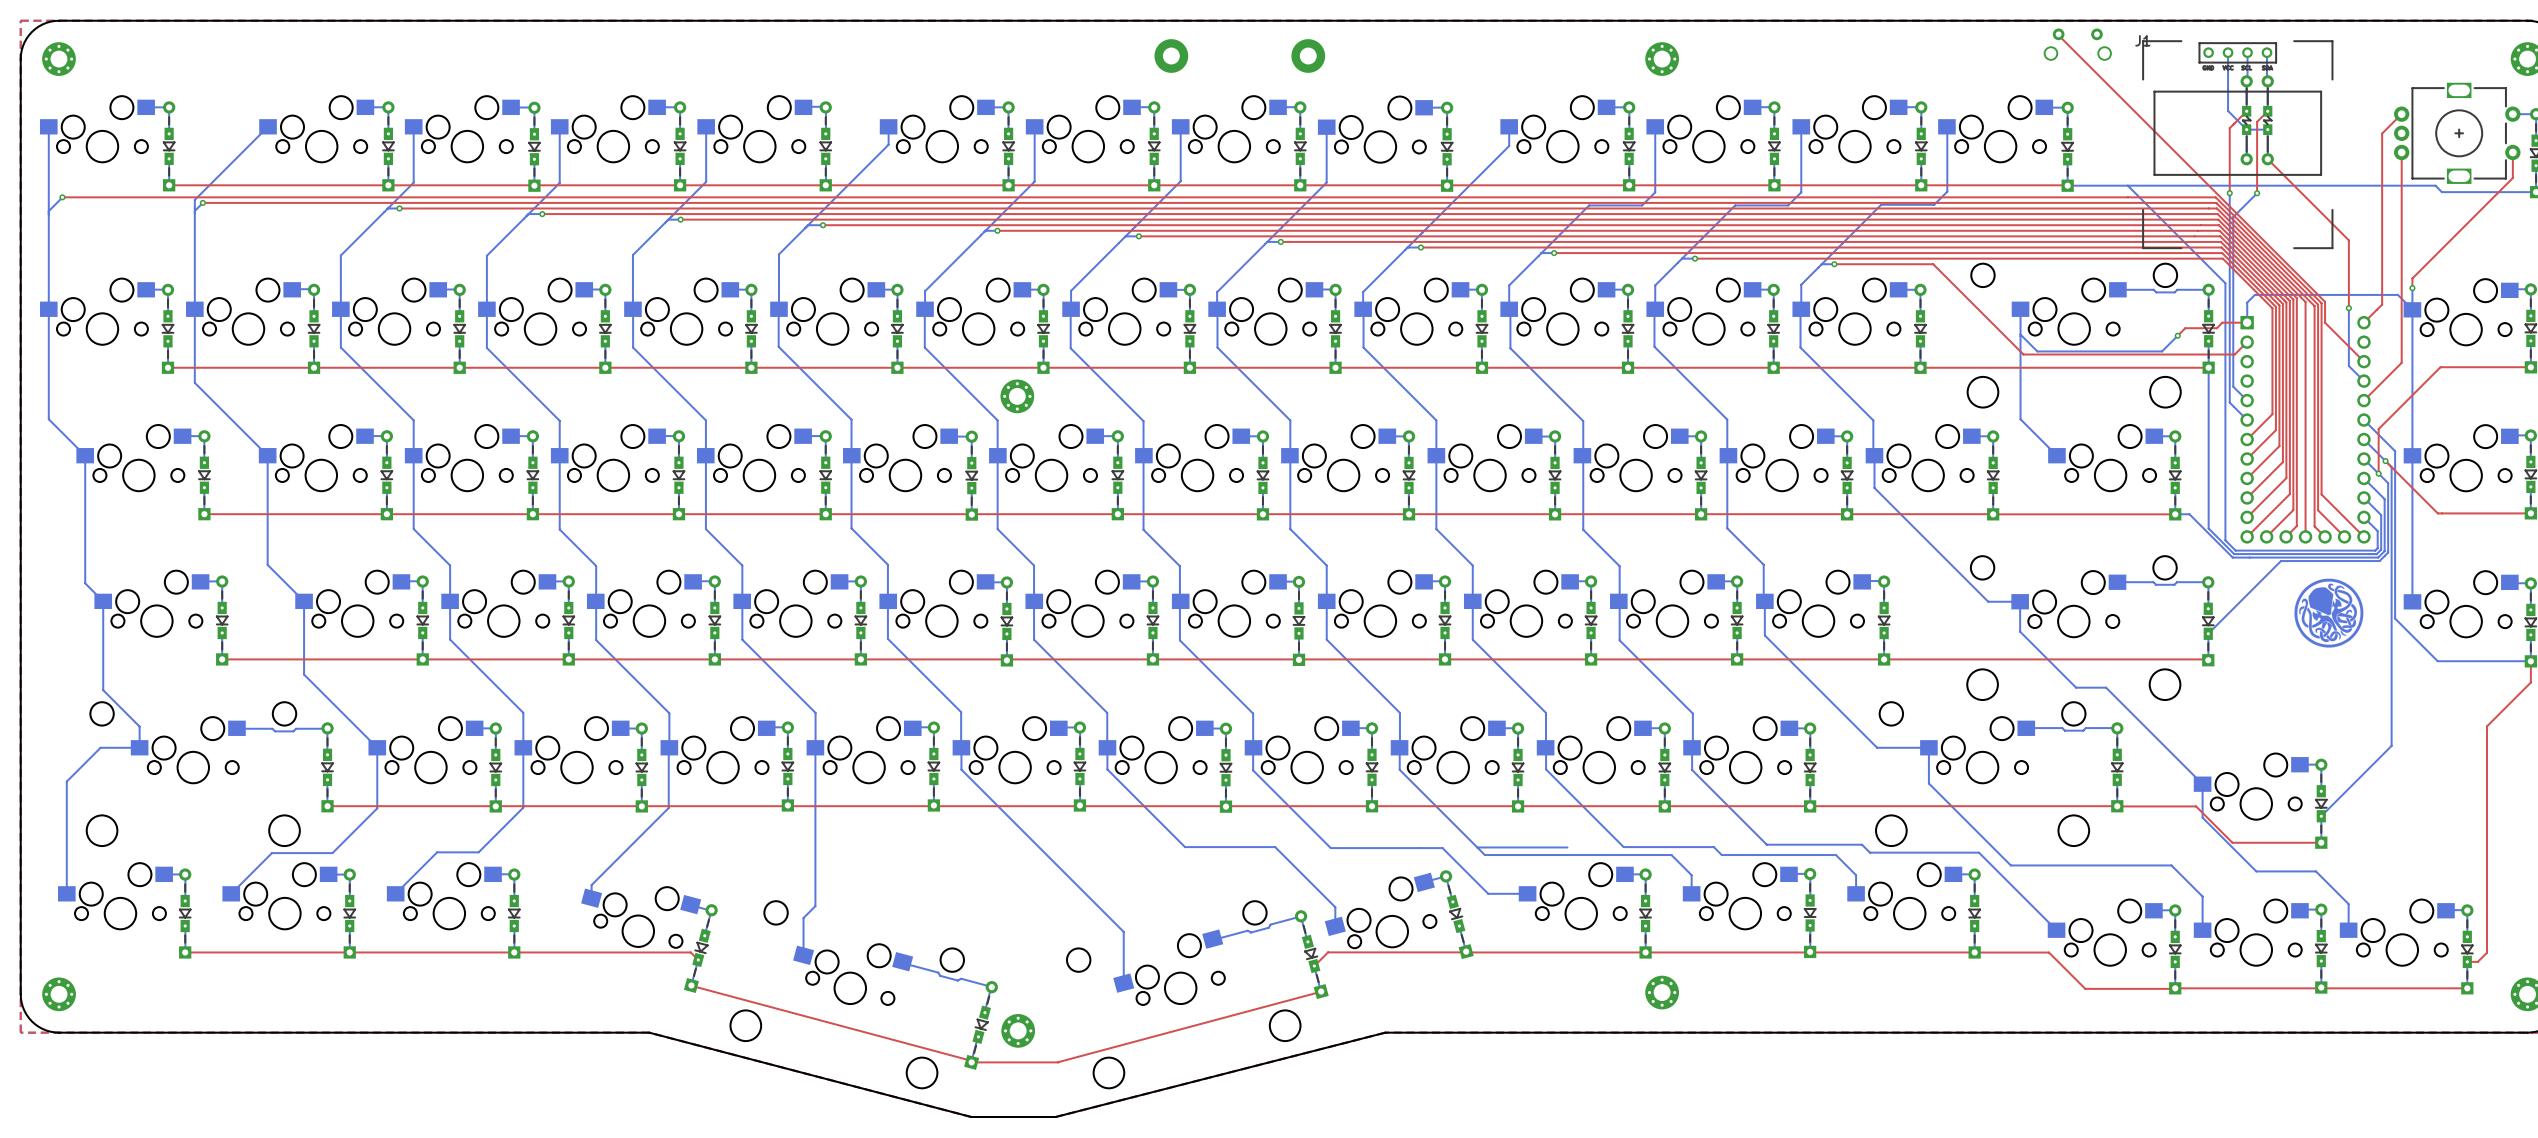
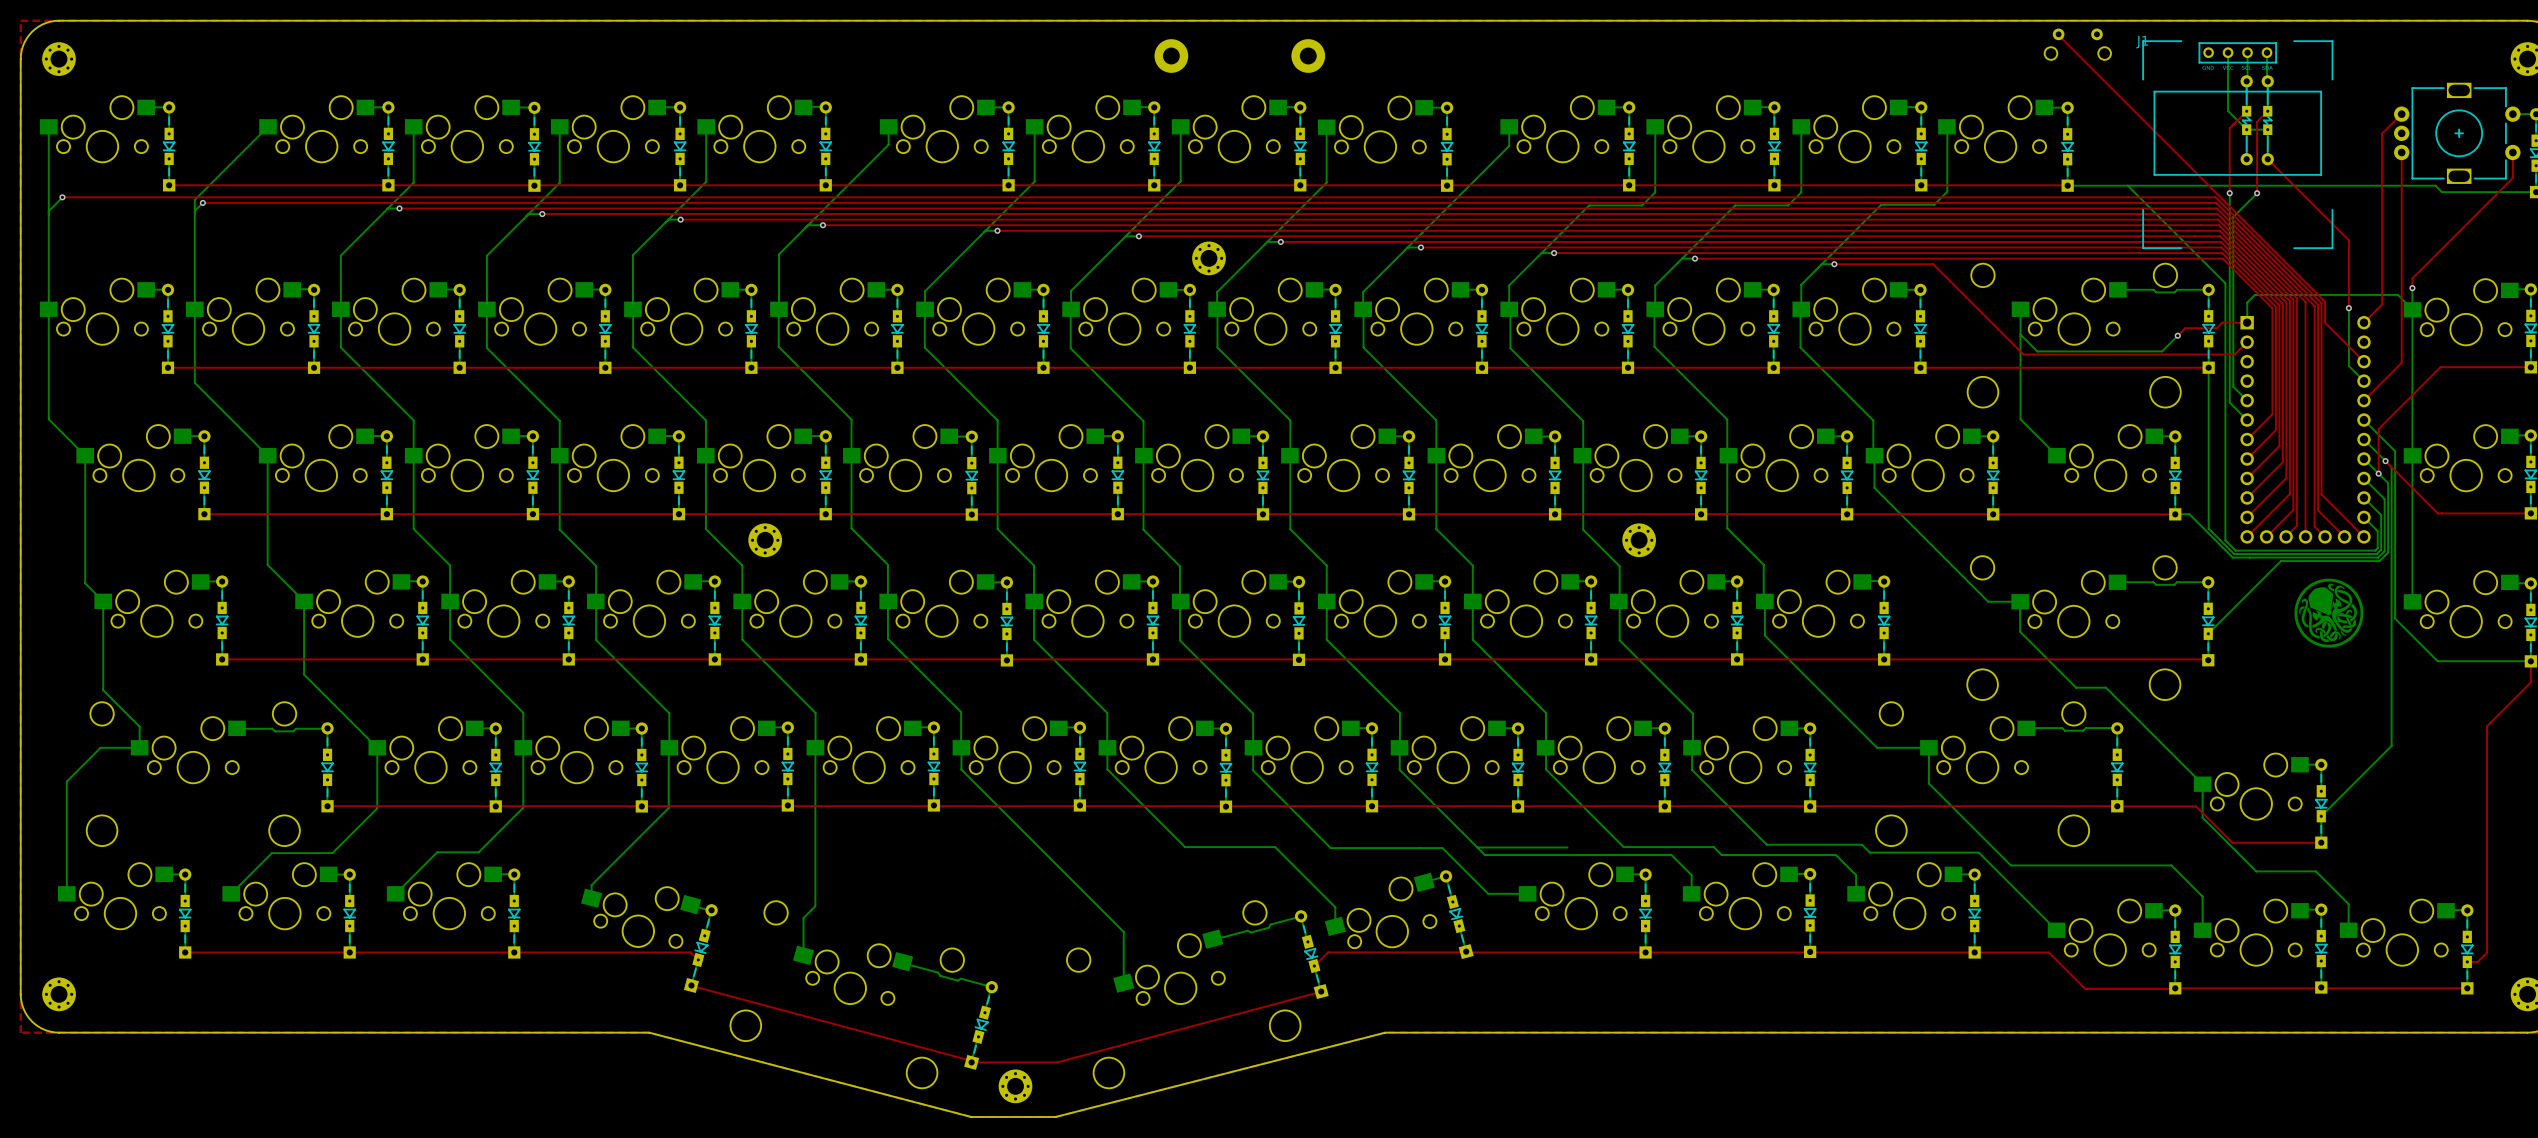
part: (1662, 59) -> none
part: none -> (1208, 258)
part: (1017, 396) -> none
part: none -> (765, 540)
part: none -> (1639, 540)
part: (1662, 992) -> none
part position: (1018, 1030) -> (1015, 1086)

